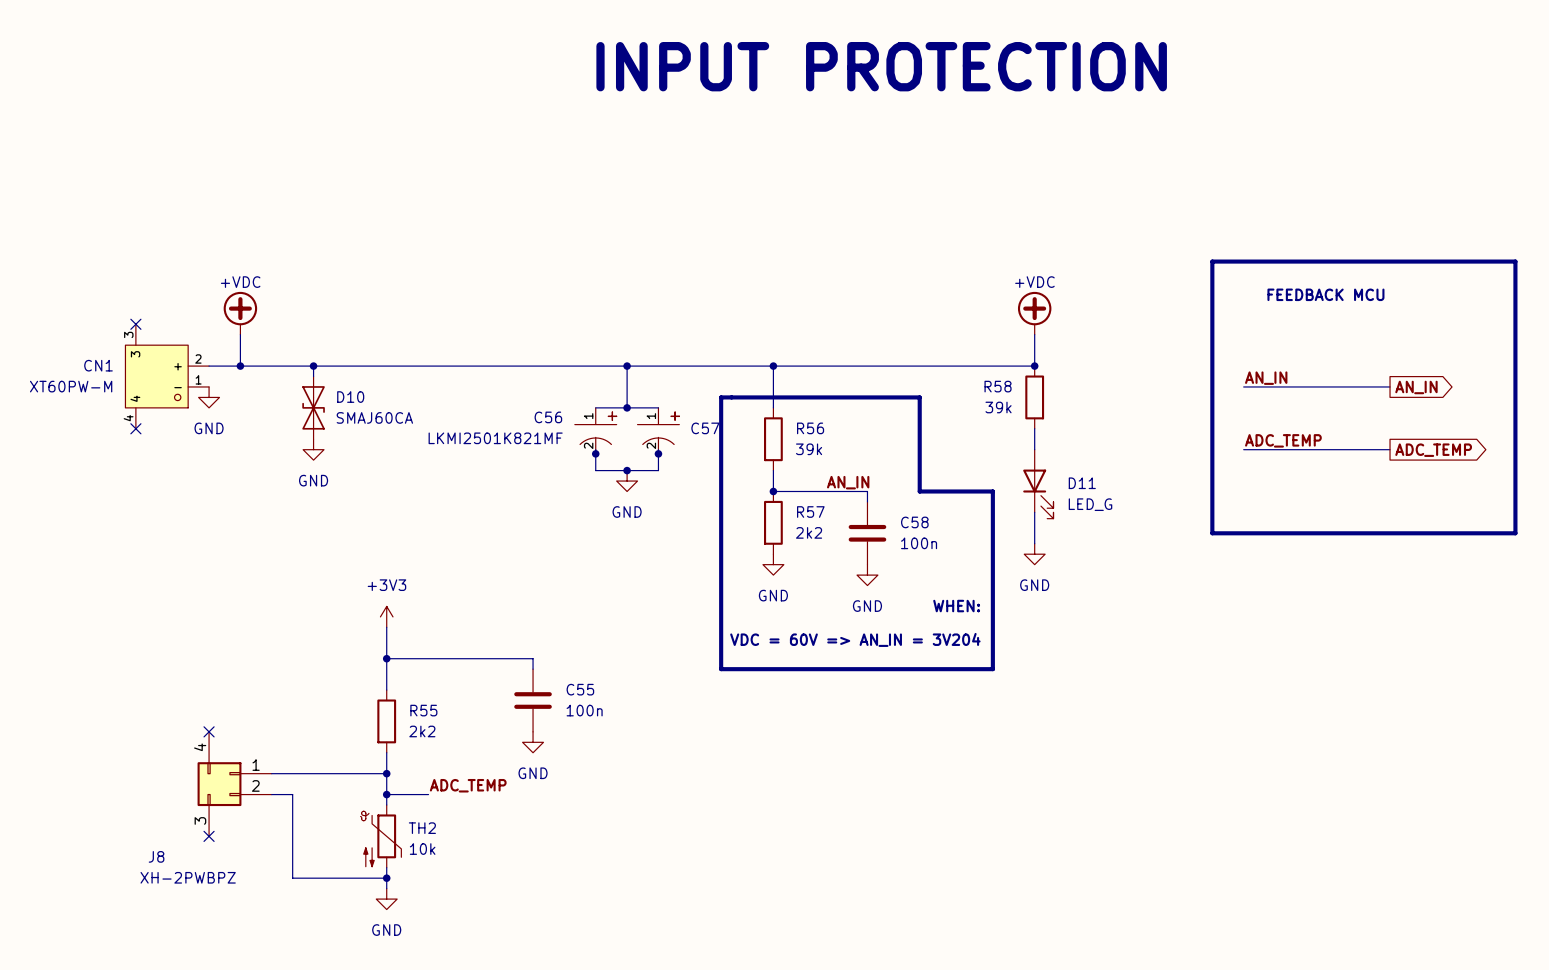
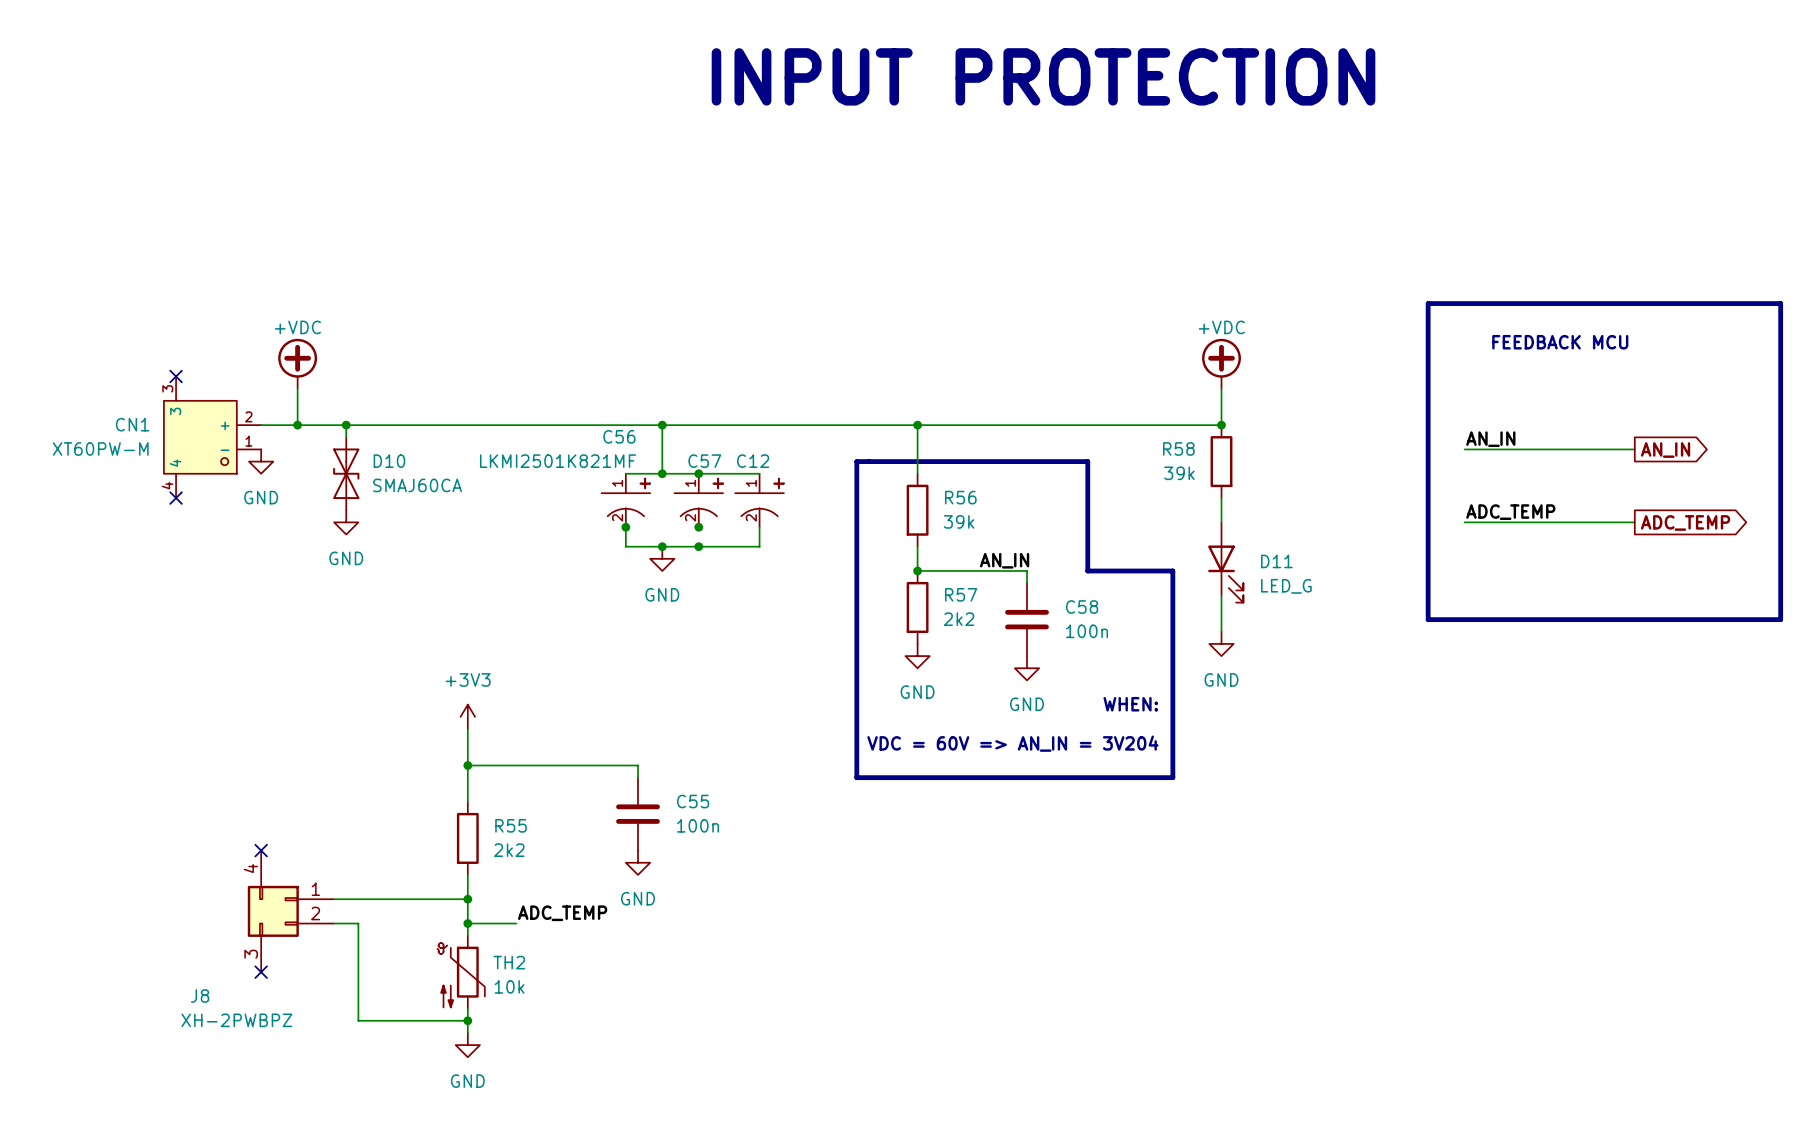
wire: (313, 366) (313, 376) -> (346, 425) (346, 437)
junction position: (313, 366) -> (346, 425)
junction: none -> (662, 425)
wire: (627, 366) (627, 407) -> (662, 425) (662, 473)
junction: (627, 366) -> none
D10 position: (313, 407) -> (346, 473)
wire: none -> (625, 473) (710, 473)
junction: none -> (662, 473)
junction: none -> (698, 473)
junction: (627, 407) -> none
wire: (637, 407) (658, 407) -> none
C56 name position: C56 (548, 417) -> C56 (619, 436)
C57 name position: C57 (705, 428) -> C57 (704, 461)
C56 position: (595, 430) -> (625, 500)
C12: none -> (759, 500)
C57 position: (658, 430) -> (698, 500)
C56 value position: LKMI2501K821MF (495, 438) -> LKMI2501K821MF (558, 461)
power symbol position: GND (313, 449) -> GND (346, 522)
wire: (595, 449) (595, 470) -> (625, 522) (625, 546) (710, 546)
wire: (658, 449) (658, 470) (637, 470) -> (759, 527) (759, 546)
junction: none -> (625, 527)
junction: none -> (698, 527)
junction: (595, 453) -> none
junction: (658, 453) -> none
junction: none -> (662, 546)
junction: none -> (698, 546)
junction: (627, 470) -> none
power symbol position: GND (627, 481) -> GND (662, 558)

